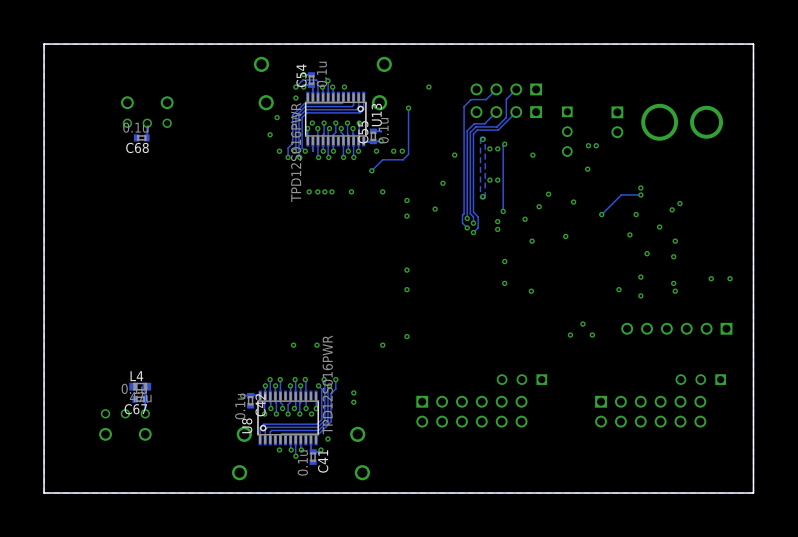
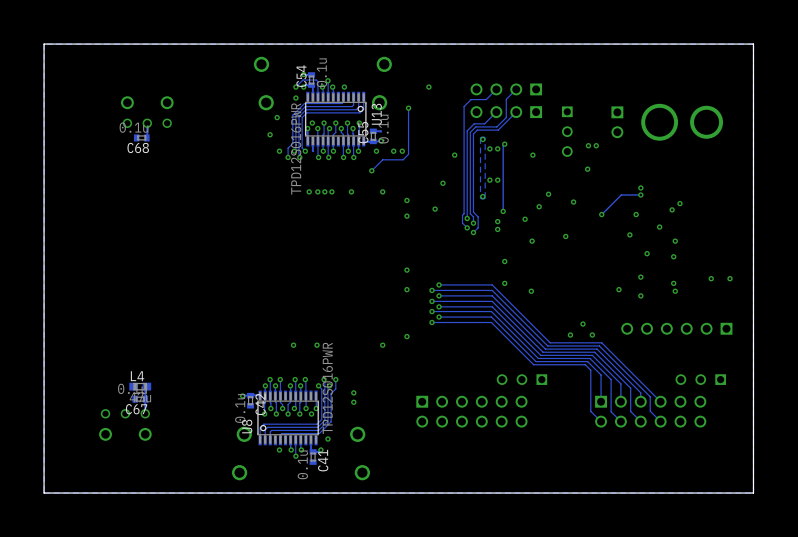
track: none -> (439, 284) (492, 284) (550, 342) (601, 342) (660, 401)
via: none -> (439, 284)
track: none -> (432, 290) (492, 290) (547, 345) (599, 345) (650, 396) (650, 411) (660, 421)
via: none -> (432, 290)
track: none -> (439, 295) (492, 295) (545, 349) (597, 349) (640, 392) (640, 401)
via: none -> (439, 295)
track: none -> (432, 301) (492, 301) (543, 352) (594, 352) (630, 388) (630, 411) (640, 421)
via: none -> (432, 301)
track: none -> (439, 306) (492, 306) (540, 355) (592, 355) (620, 383) (620, 401)
via: none -> (439, 306)
track: none -> (432, 311) (491, 311) (538, 358) (590, 358) (611, 379) (611, 411) (620, 421)
via: none -> (432, 311)
track: none -> (439, 317) (491, 317) (536, 361) (587, 361) (601, 374) (601, 401)
via: none -> (439, 317)
track: none -> (432, 322) (491, 322) (533, 364) (585, 364) (590, 370) (590, 411) (601, 421)
via: none -> (432, 322)

